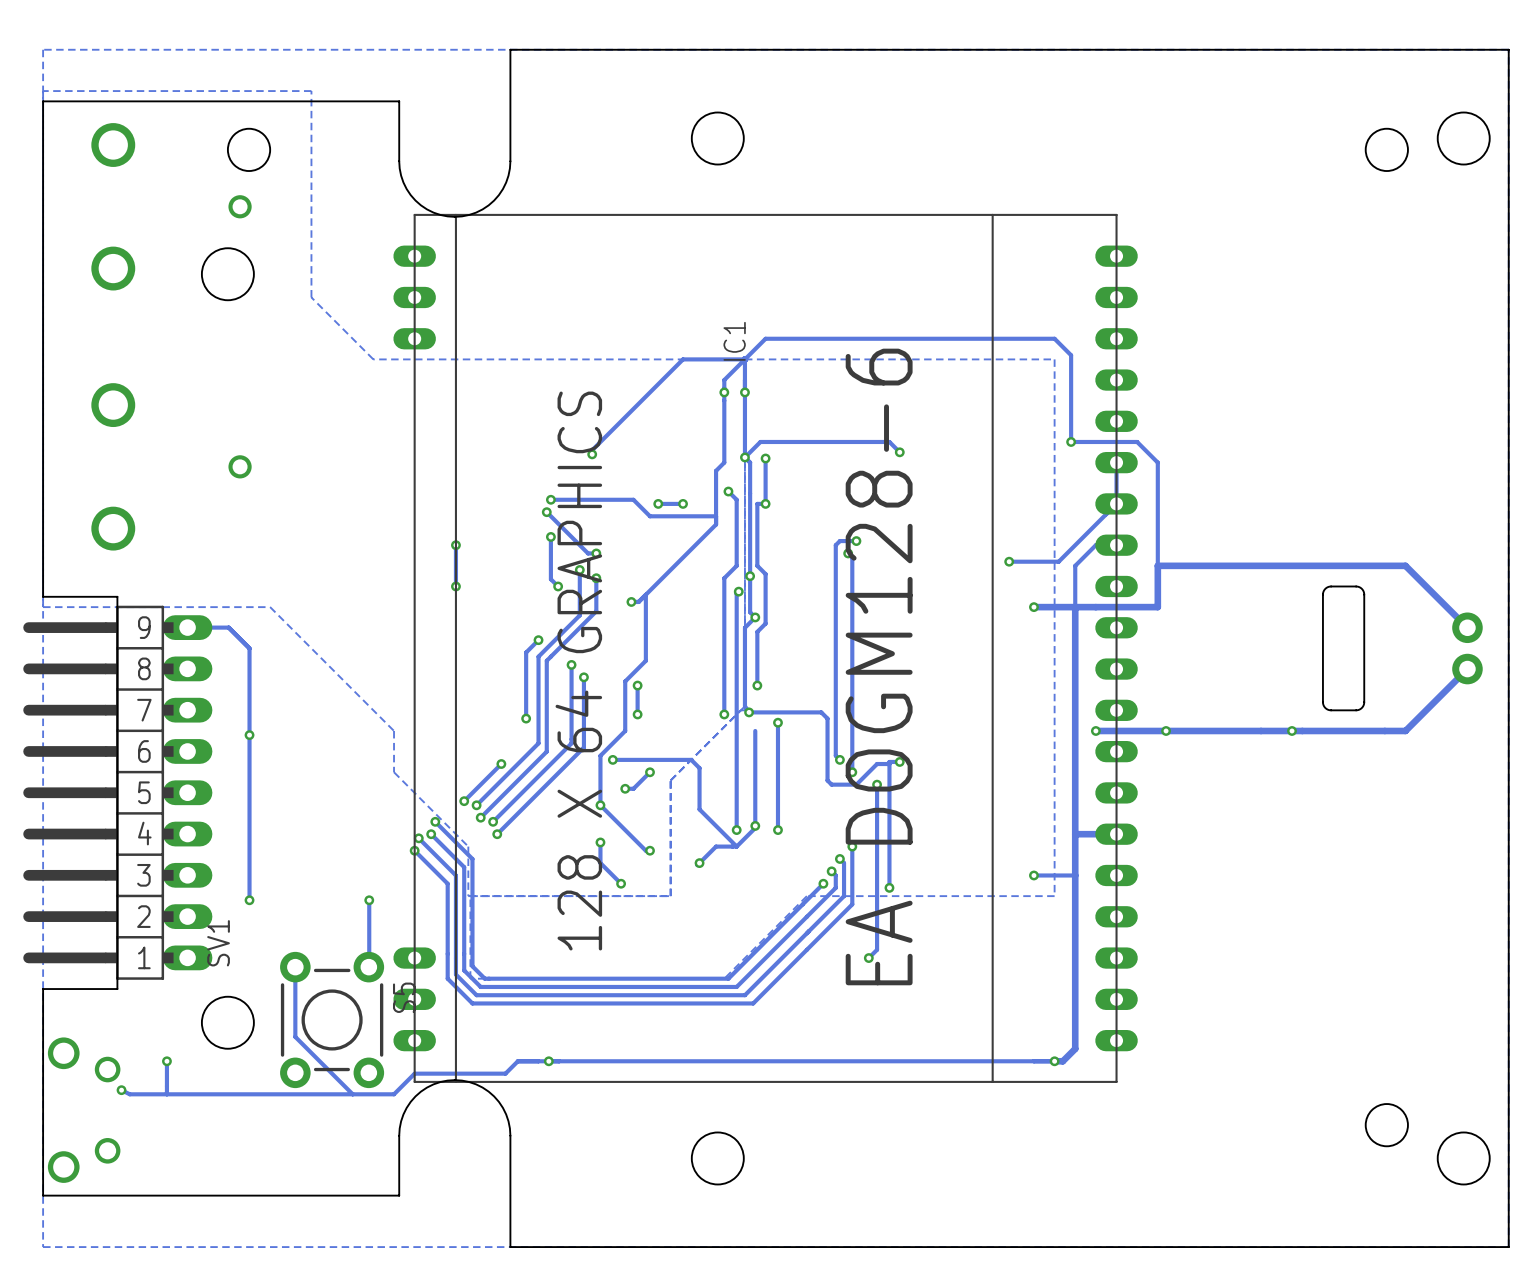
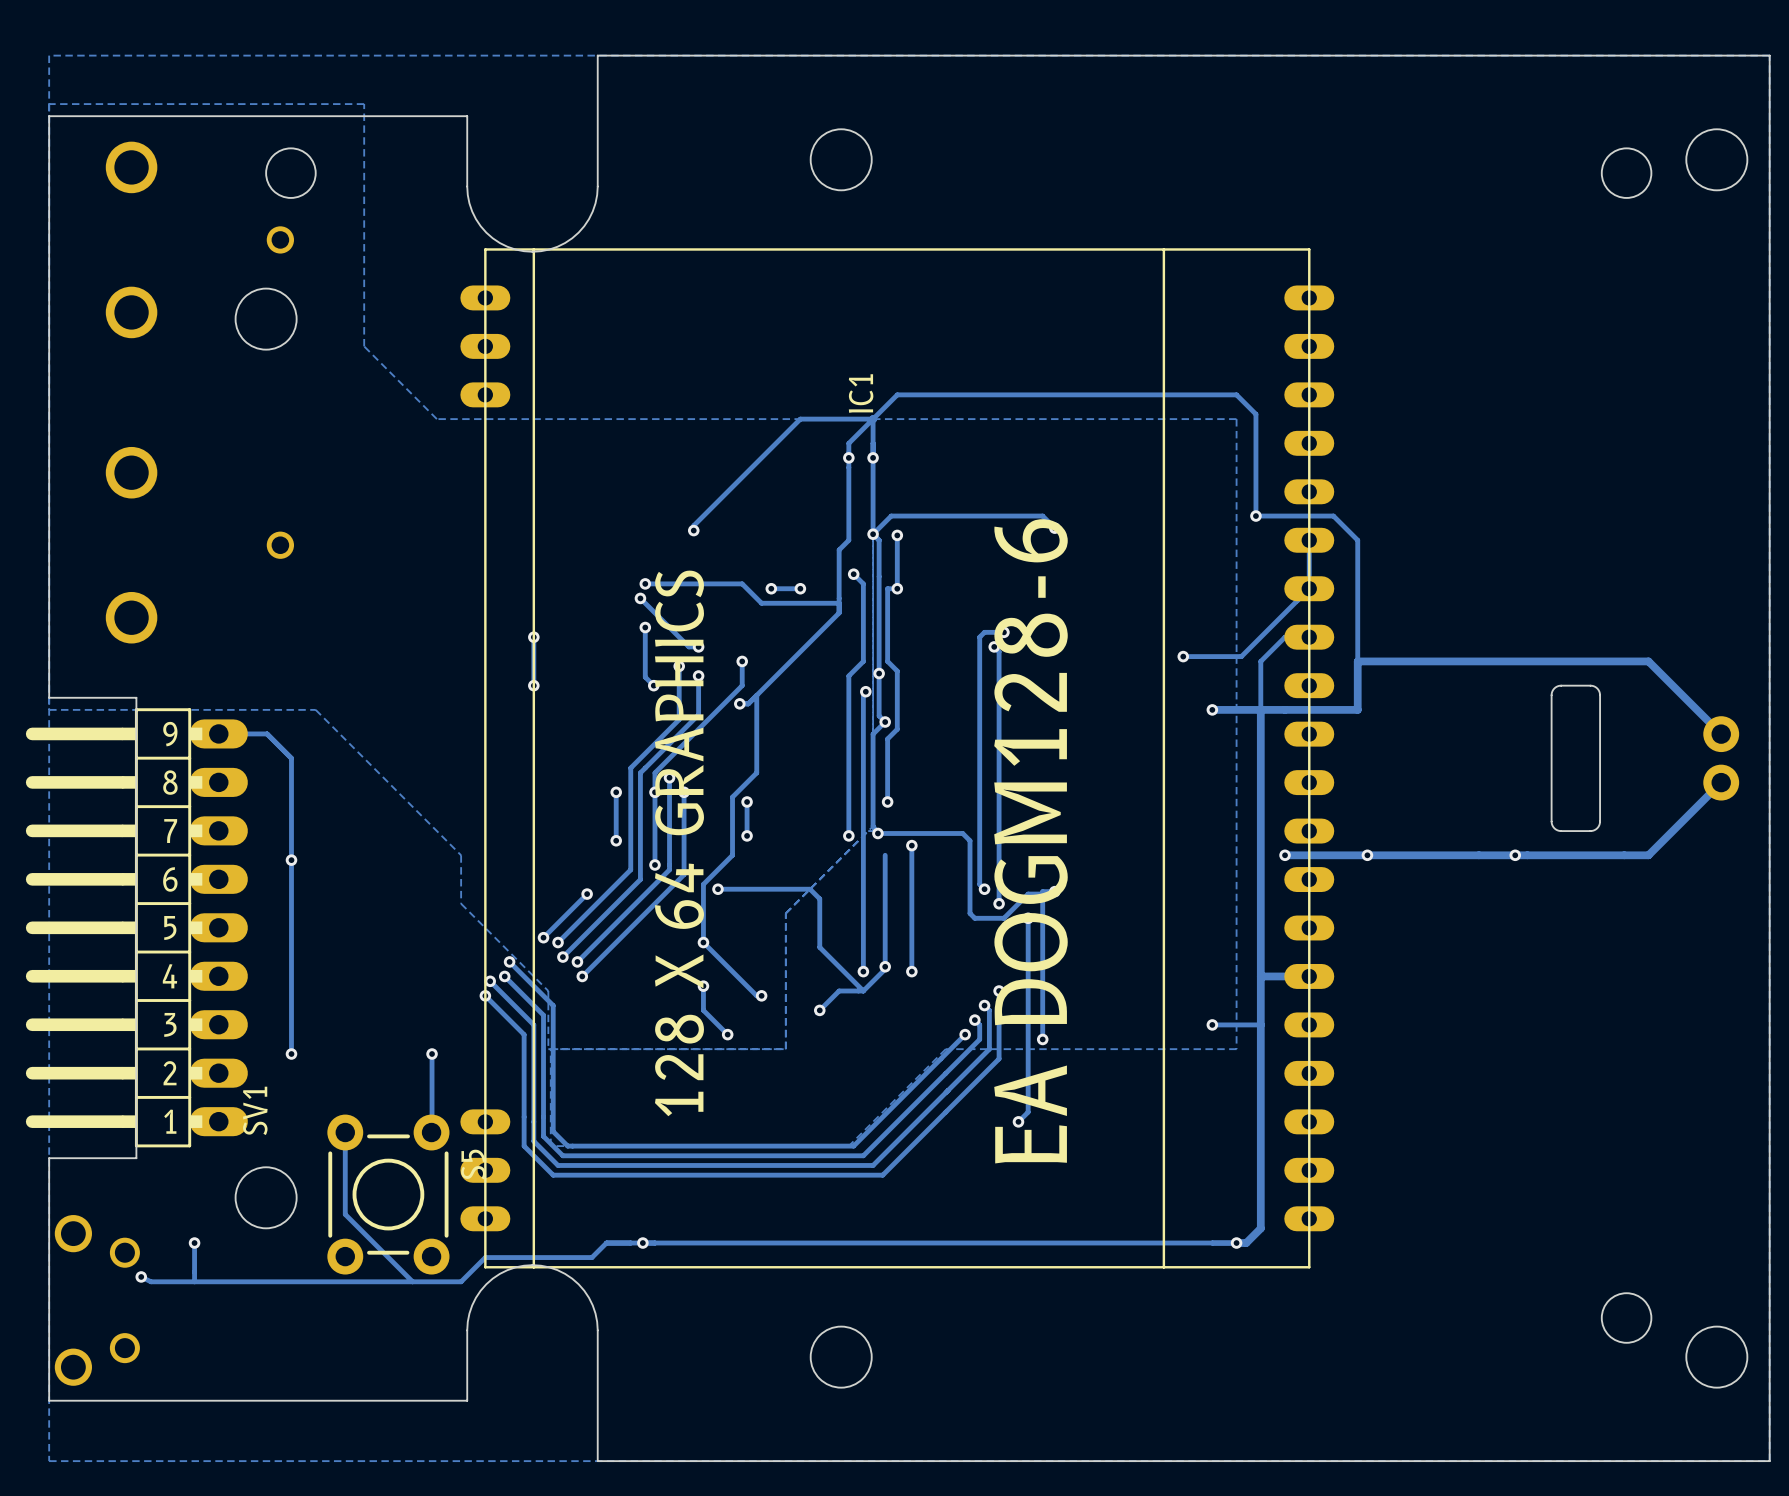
track: none -> (742, 661) (742, 685) (654, 772) (654, 864)
via: none -> (742, 661)
track: (538, 640) (526, 652) (526, 677) -> none
via: (538, 640) -> none
via: none -> (616, 792)
via: none -> (654, 792)
via: none -> (654, 864)
track: (650, 772) (633, 788) (625, 788) -> none
via: (650, 772) -> none
via: (625, 788) -> none

